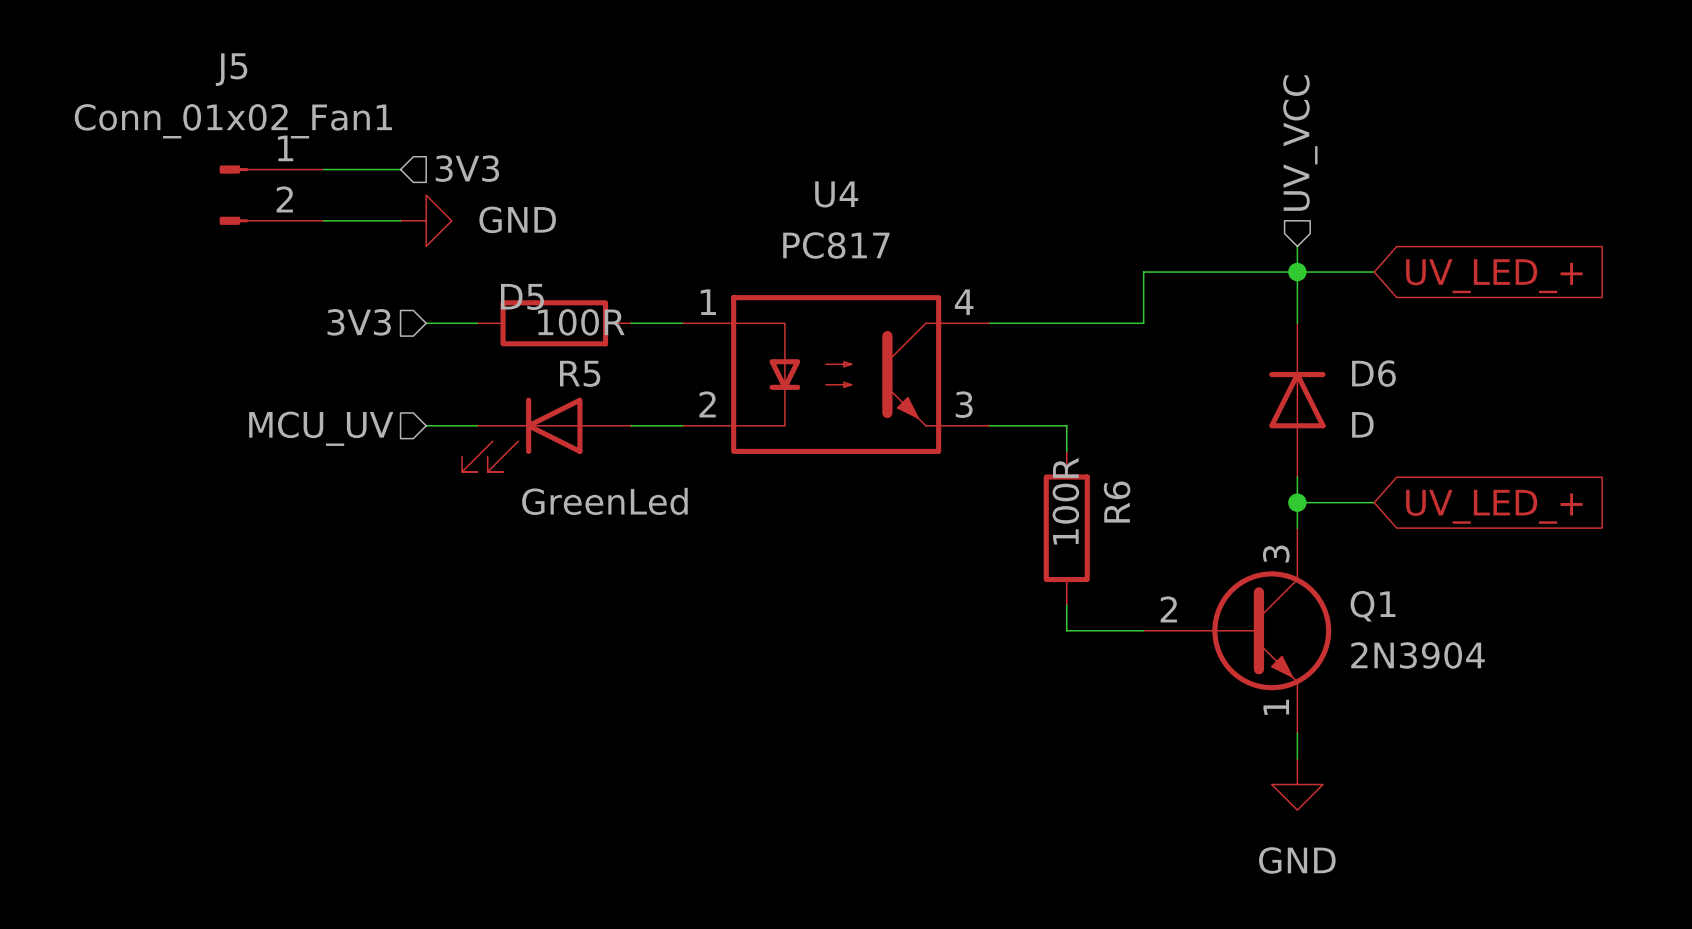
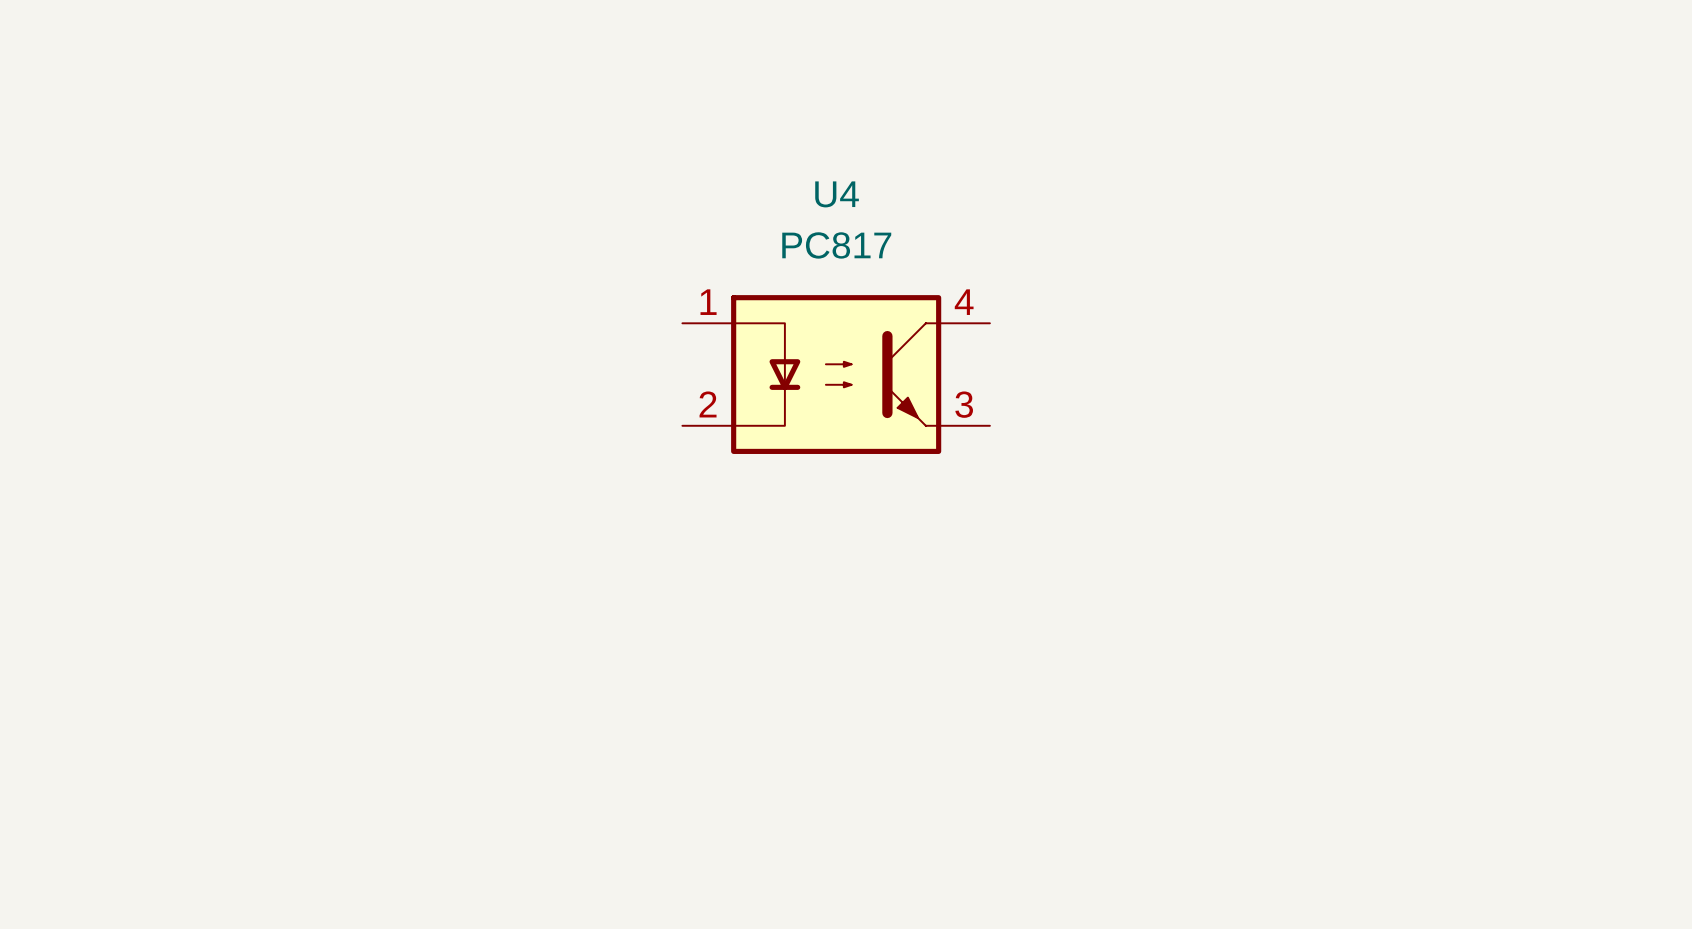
hierarchical label: UV_VCC (1300, 143) -> none
hierarchical label: 3V3 (467, 168) -> none
wire: (323, 169) (400, 169) -> none
J5: Conn_01x02_Fan1 (271, 195) -> none
wire: (323, 220) (400, 220) -> none
power symbol: GND (426, 220) -> none
wire: (1297, 246) (1297, 323) -> none
junction: (1297, 272) -> none
wire: (1374, 272) (1143, 272) (1143, 323) (989, 323) -> none
global label: UV_LED_+ (1494, 276) -> none
hierarchical label: 3V3 (359, 322) -> none
wire: (426, 323) (477, 323) -> none
R5: 100R (554, 323) -> none
wire: (631, 323) (682, 323) -> none
D6: D (1297, 400) -> none
wire: (426, 425) (477, 425) -> none
wire: (631, 425) (682, 425) -> none
wire: (989, 425) (1066, 425) (1066, 451) -> none
hierarchical label: MCU_UV (321, 428) -> none
D5: GreenLed (546, 434) -> none
wire: (1297, 477) (1297, 528) -> none
wire: (1297, 502) (1374, 502) -> none
junction: (1297, 502) -> none
global label: UV_LED_+ (1494, 506) -> none
R6: 100R (1066, 528) -> none
wire: (1066, 605) (1066, 630) (1143, 630) -> none
Q1: 2N3904 (1237, 630) -> none
wire: (1297, 733) (1297, 758) -> none
power symbol: GND (1297, 784) -> none

